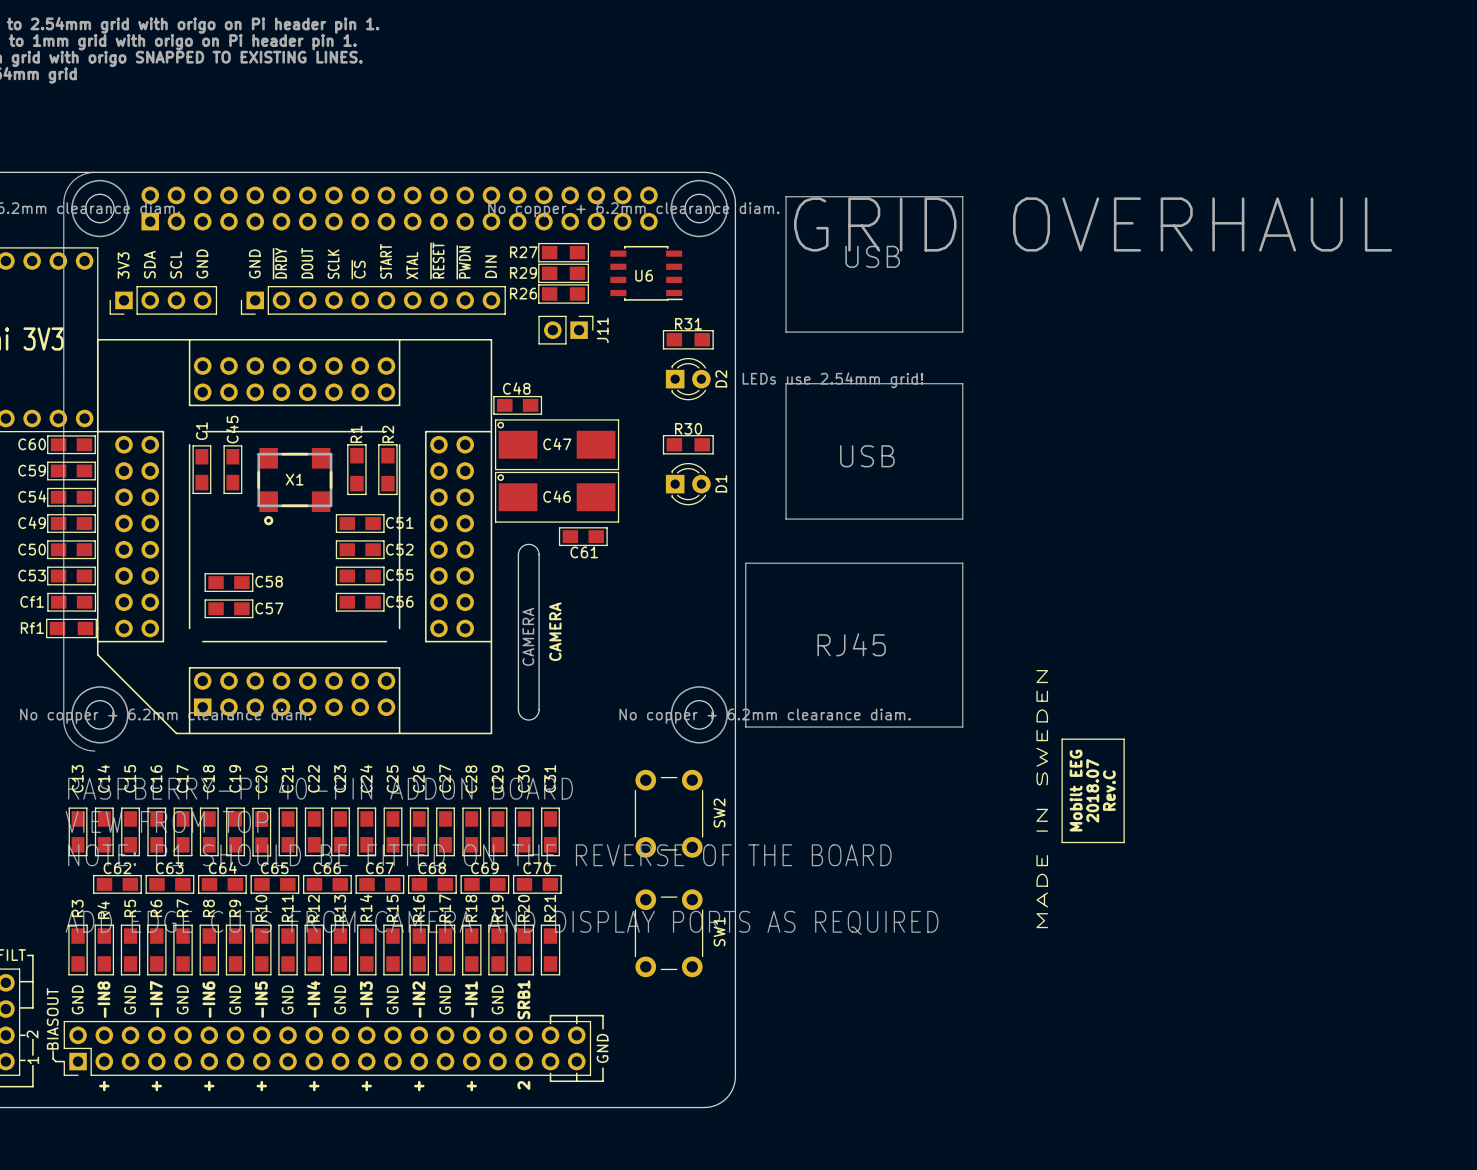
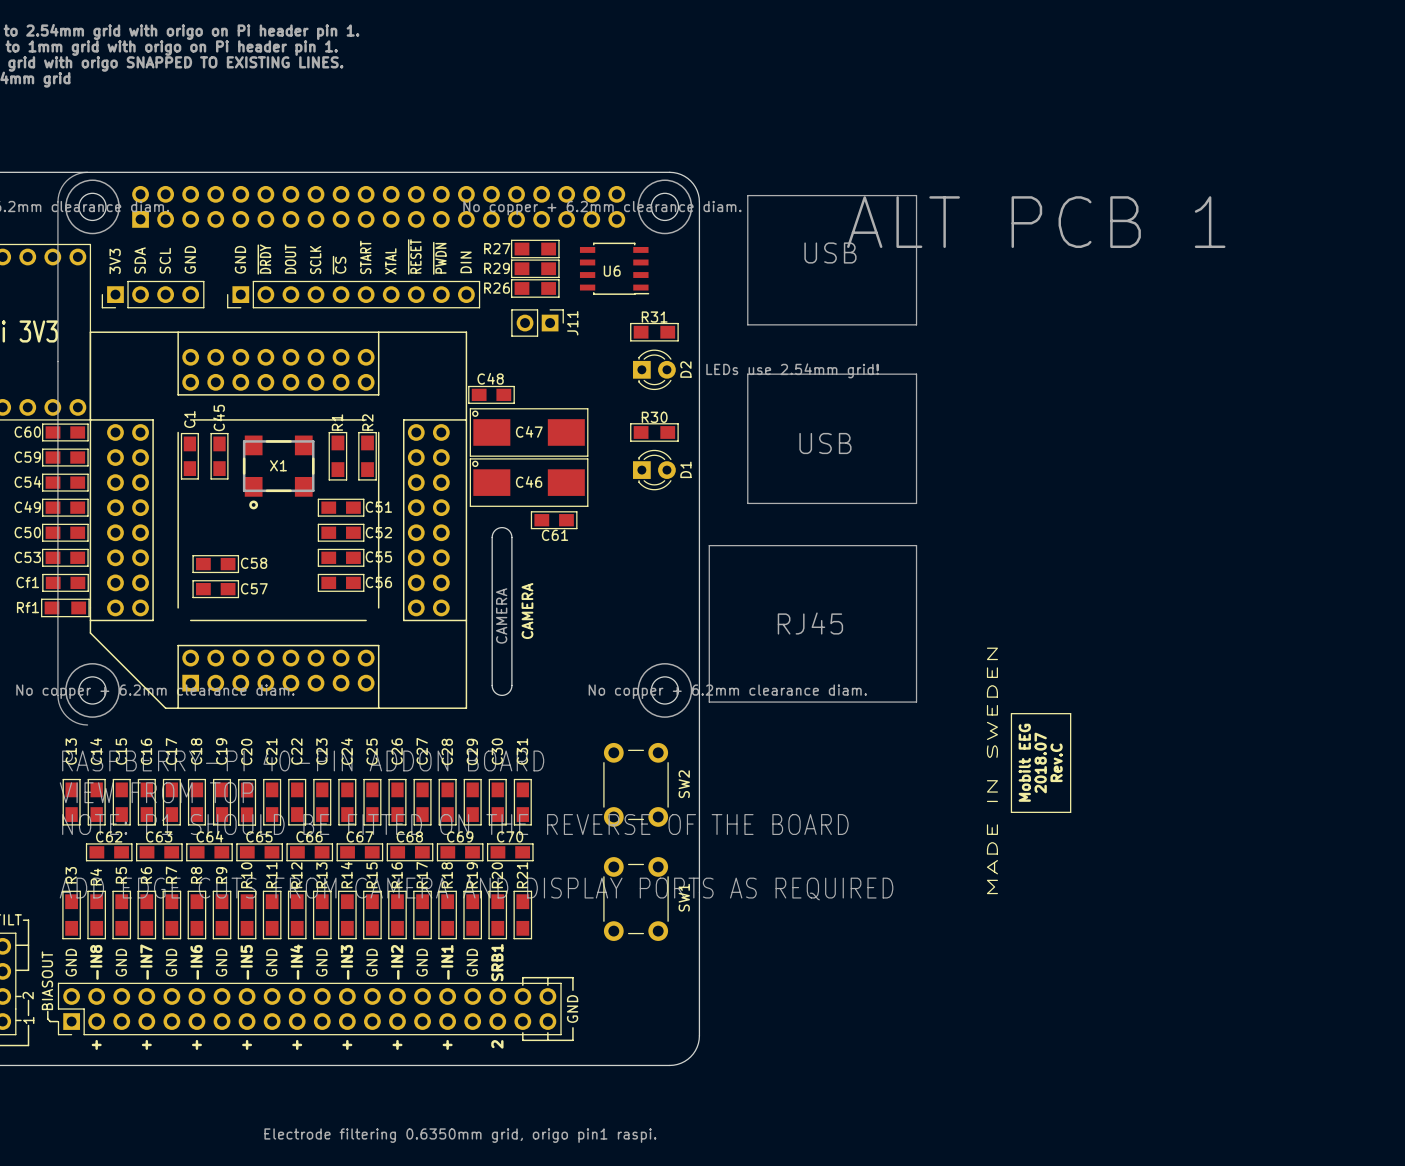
text: GRID OVERHAUL (1093, 224) -> ALT PCB 1 (1036, 222)

